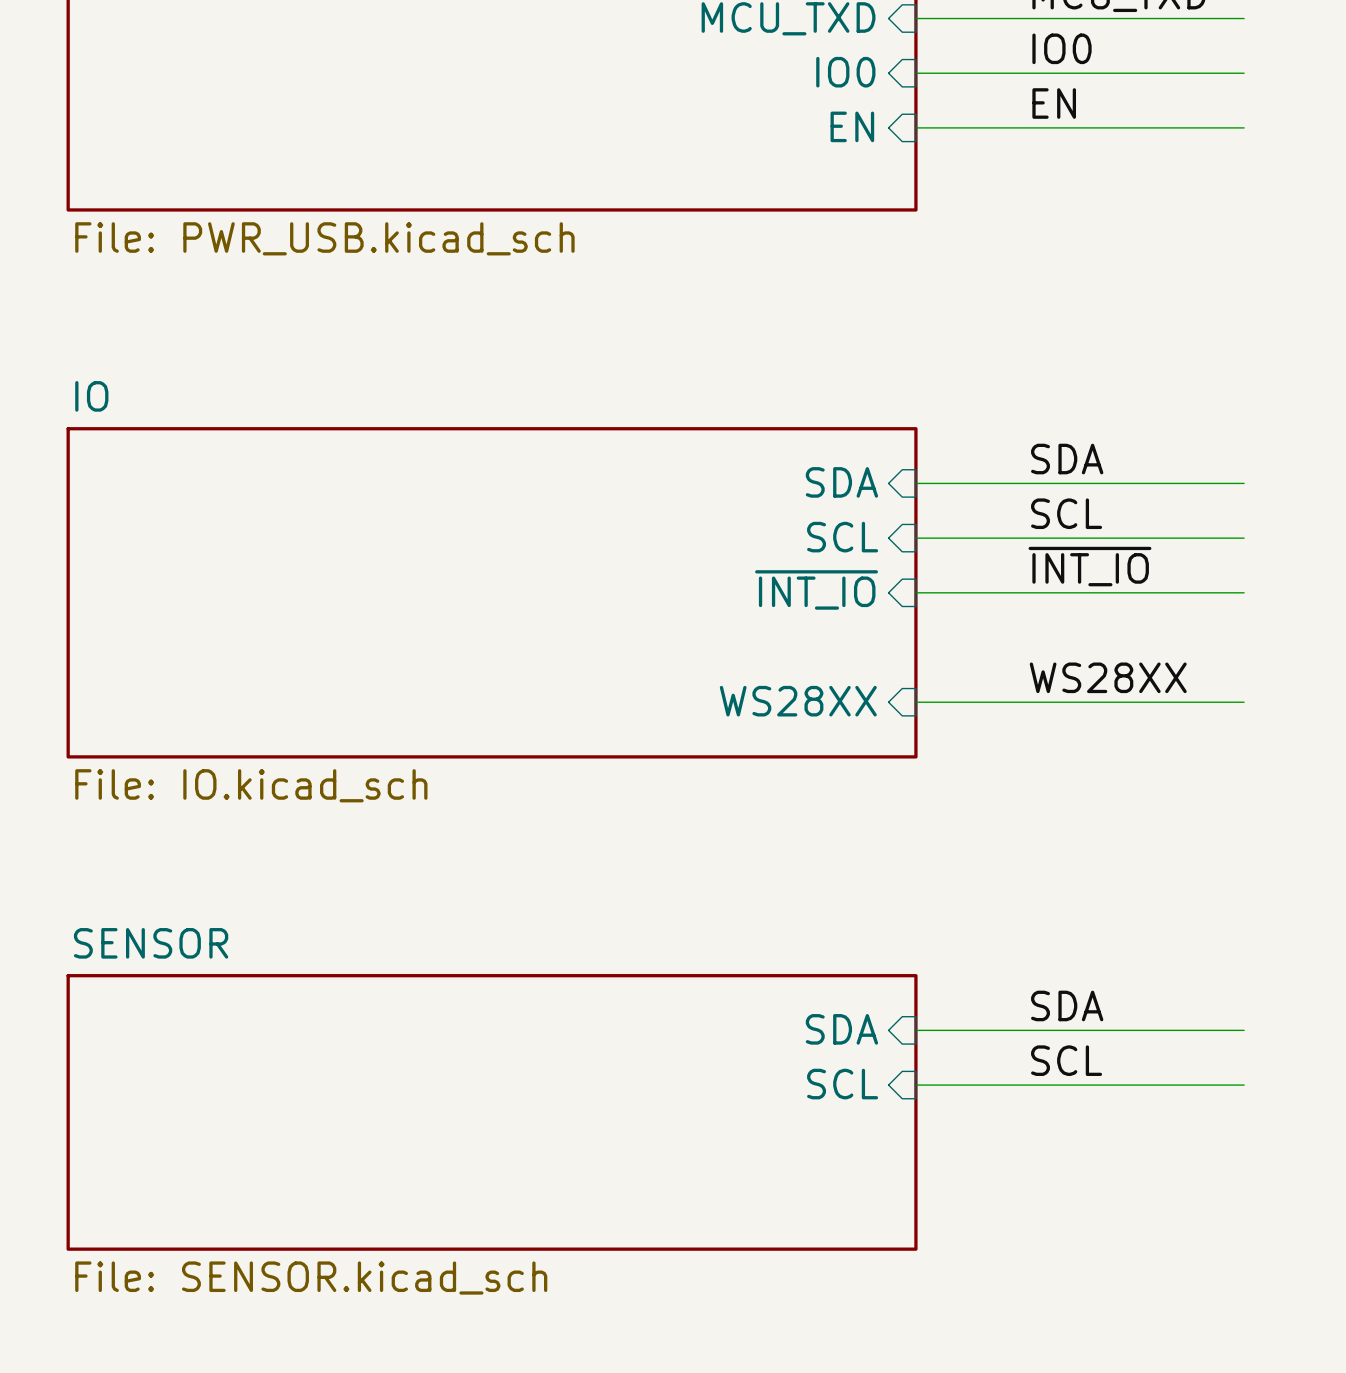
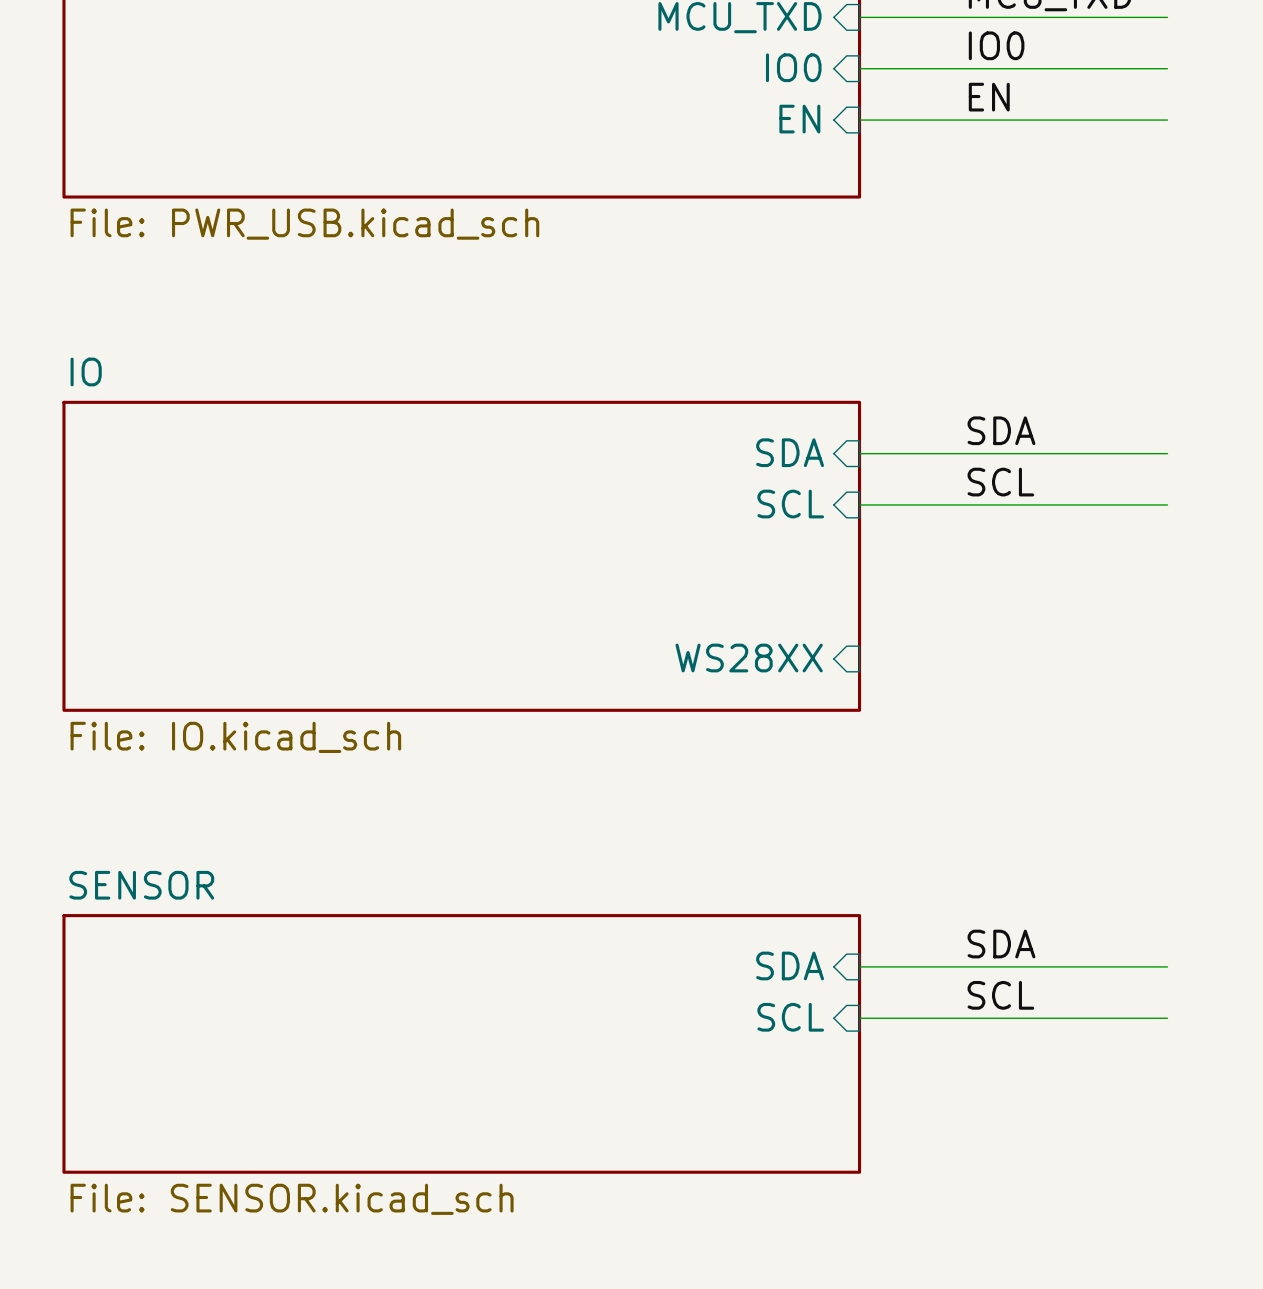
label: ~{INT_IO} (1089, 566) -> none
sheet pin: ~{INT_IO} (816, 589) -> none
wire: (915, 592) (1244, 592) -> none
label: WS28XX (1108, 677) -> none
wire: (915, 702) (1244, 702) -> none

